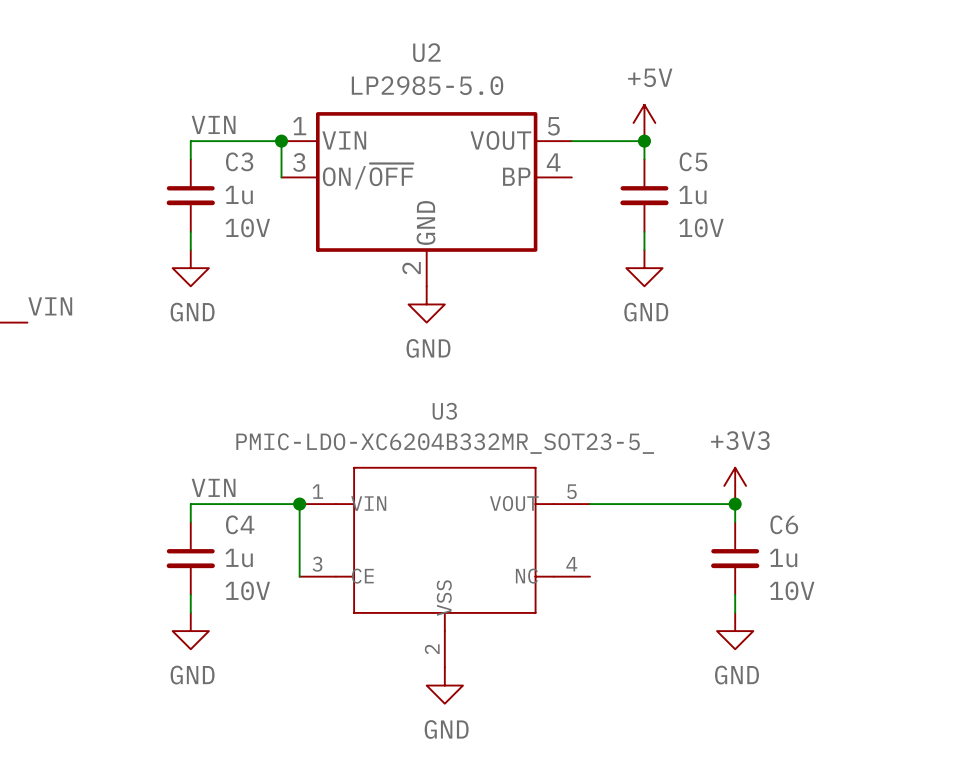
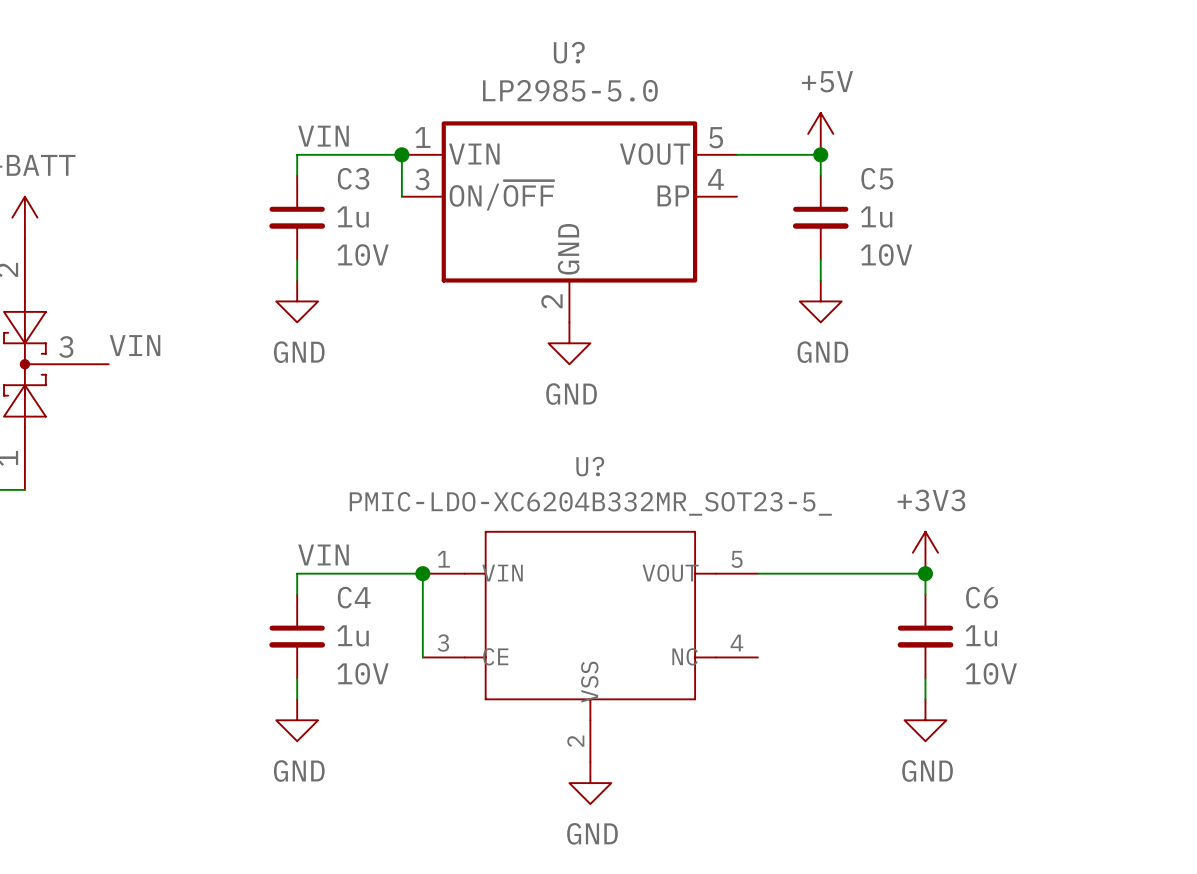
U2 name: U2 (426, 52) -> U? (569, 52)
U3 name: U3 (444, 411) -> U? (590, 466)

